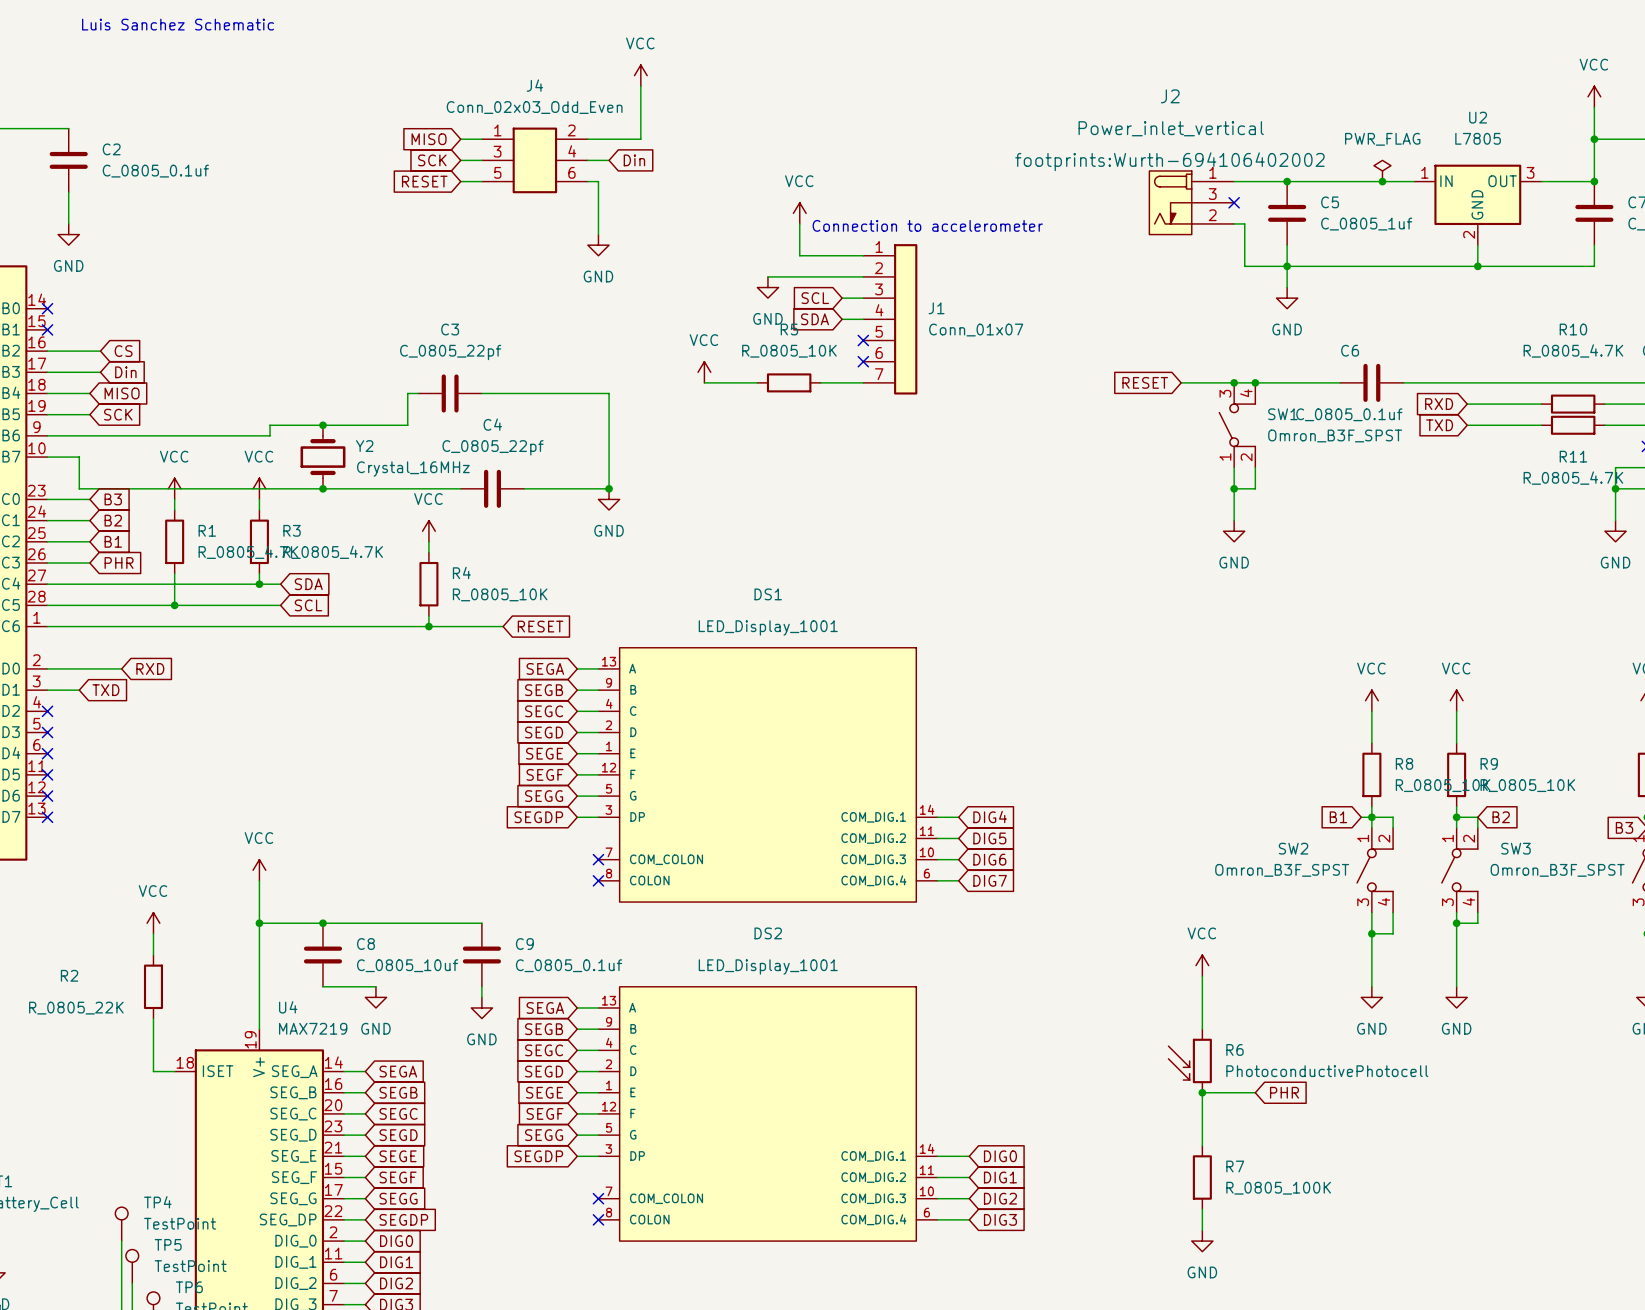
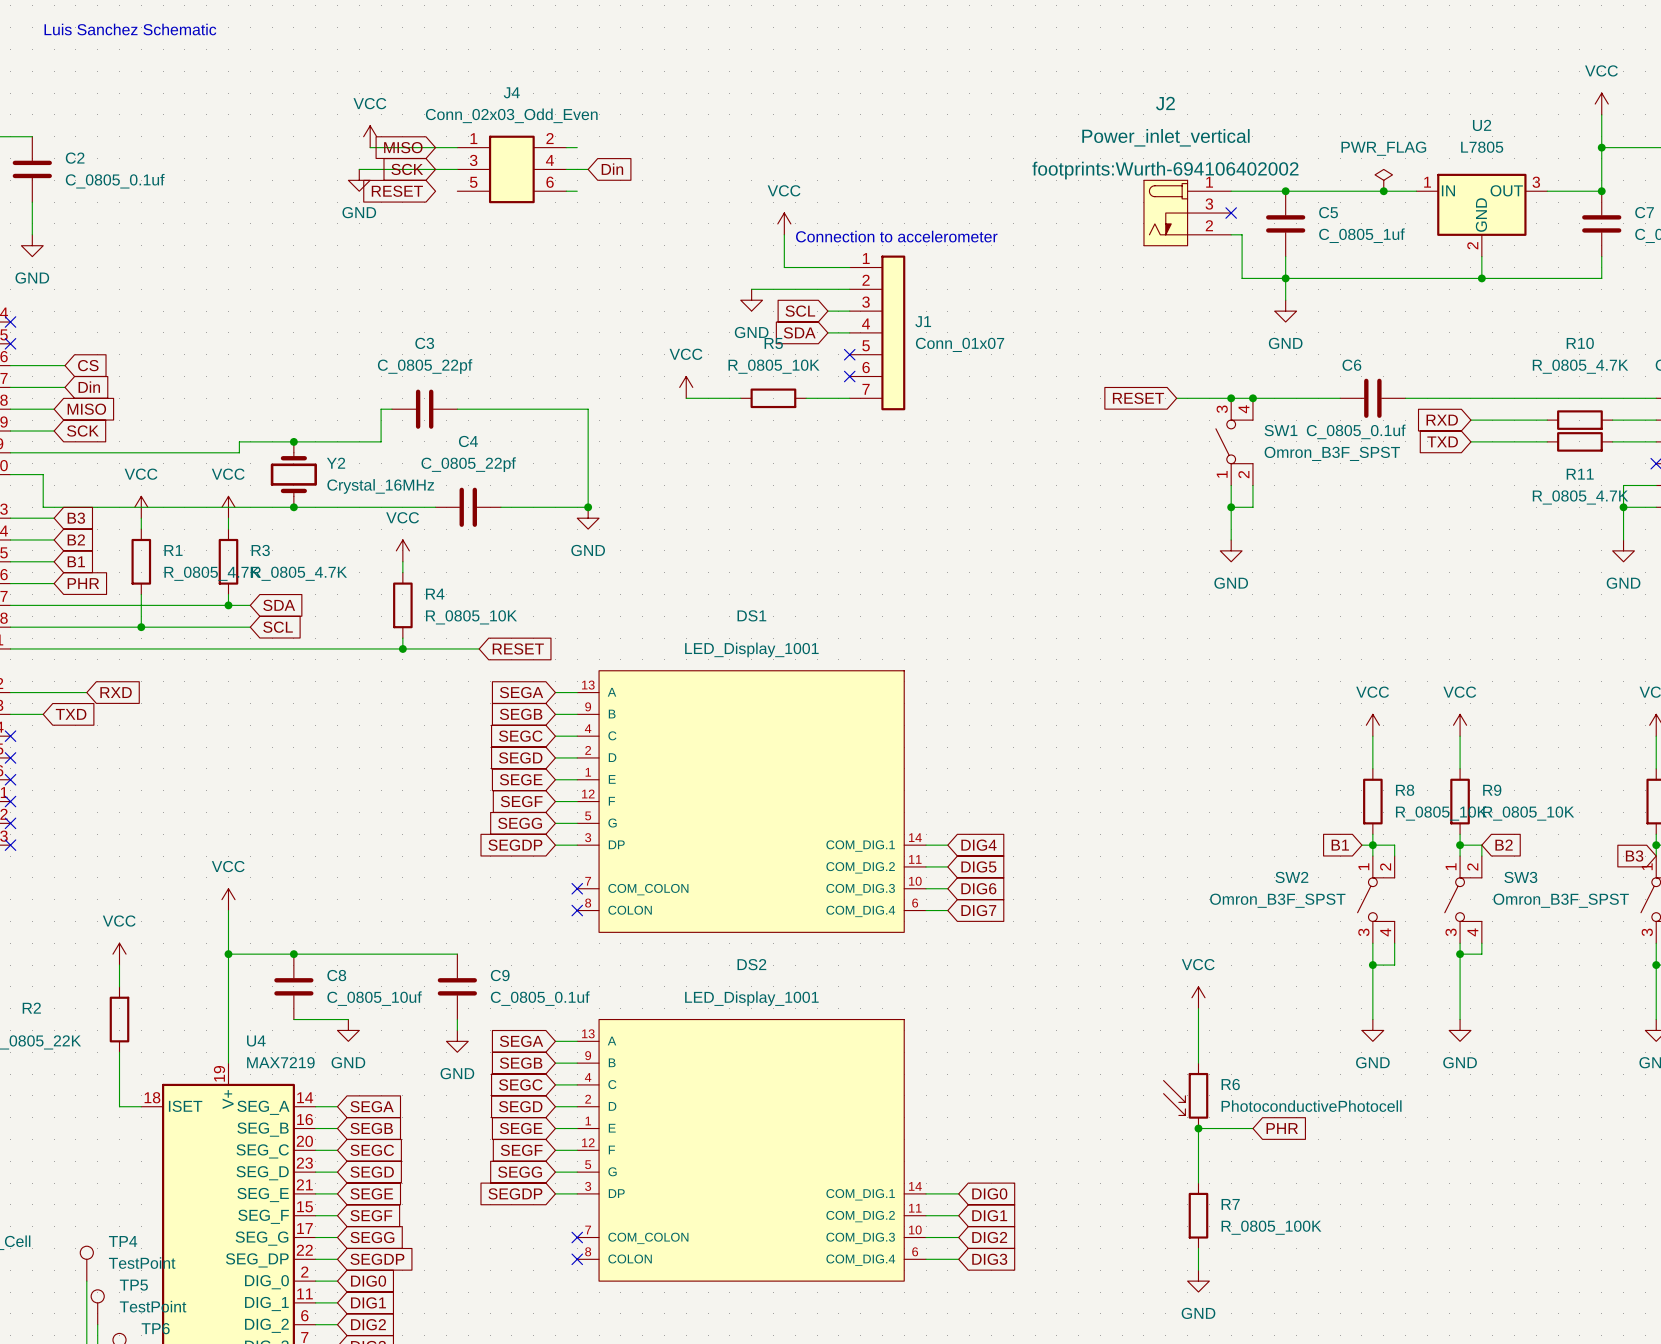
power symbol: VCC (640, 75) -> none
wire: (640, 86) (640, 139) (598, 139) -> none
power symbol: none -> VCC (370, 136)
wire: none -> (370, 147) (435, 147)
wire: none -> (359, 169) (435, 169)
power symbol: none -> GND (359, 180)
wire: (460, 181) (481, 181) -> none
wire: (598, 181) (598, 234) -> none
power symbol: GND (598, 245) -> none

